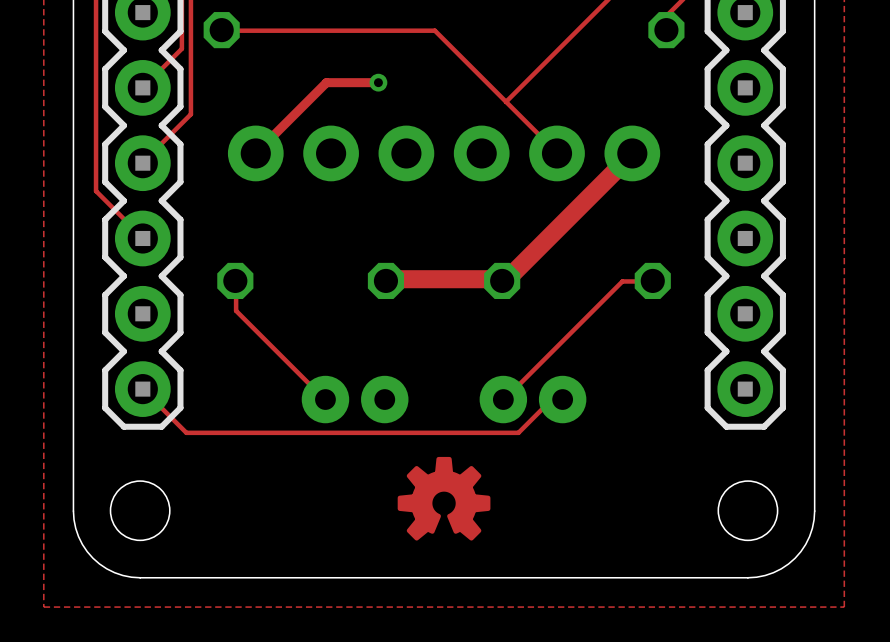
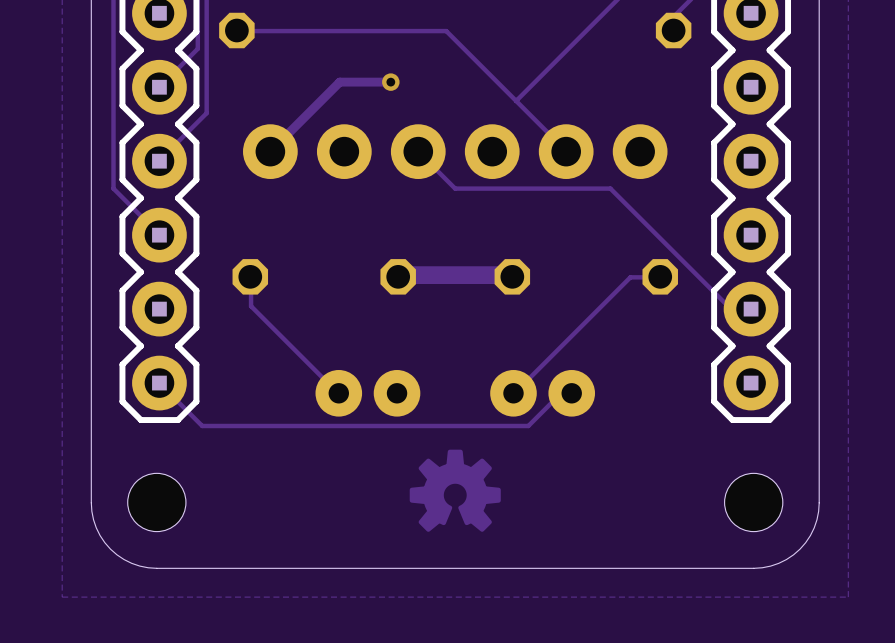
track: none -> (418, 151) (455, 188) (610, 188) (730, 308) (751, 309)
track: (632, 153) (509, 276) (502, 280) -> none

